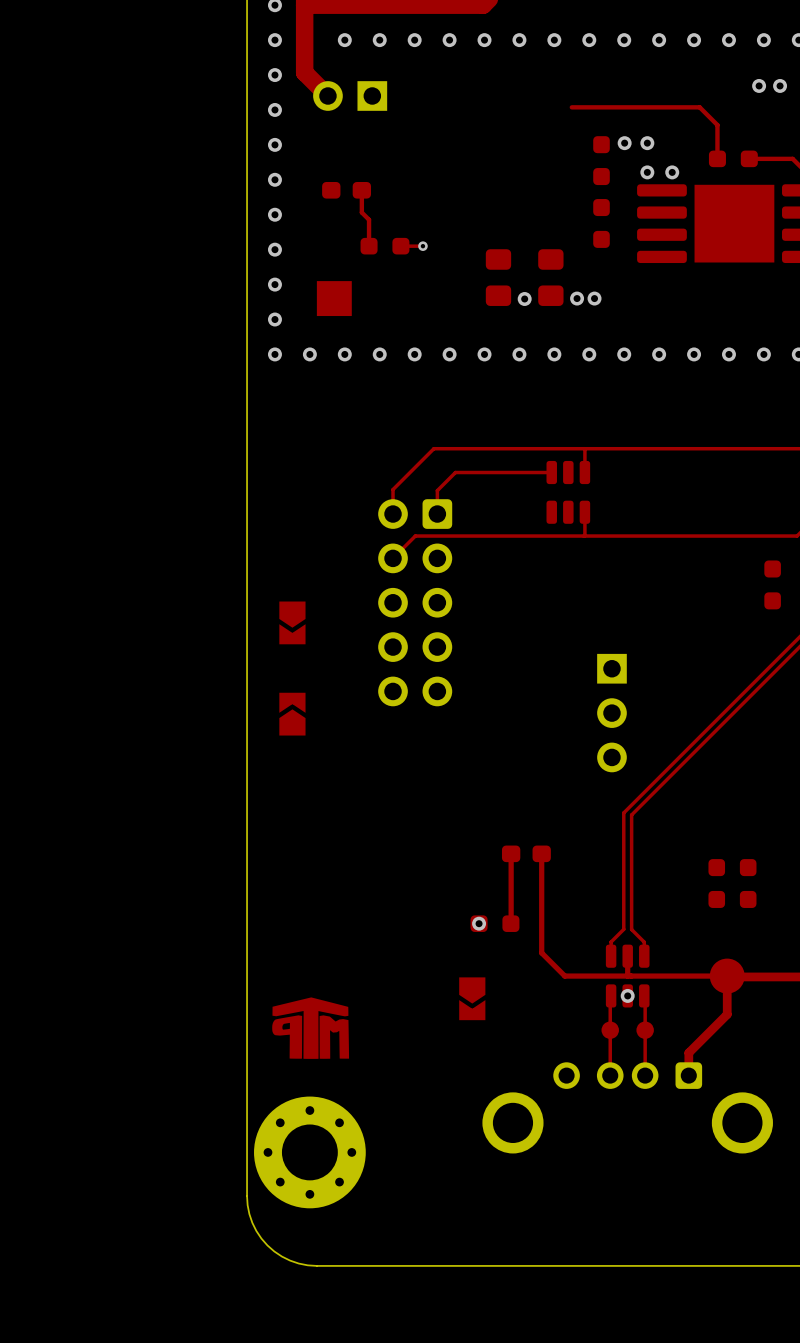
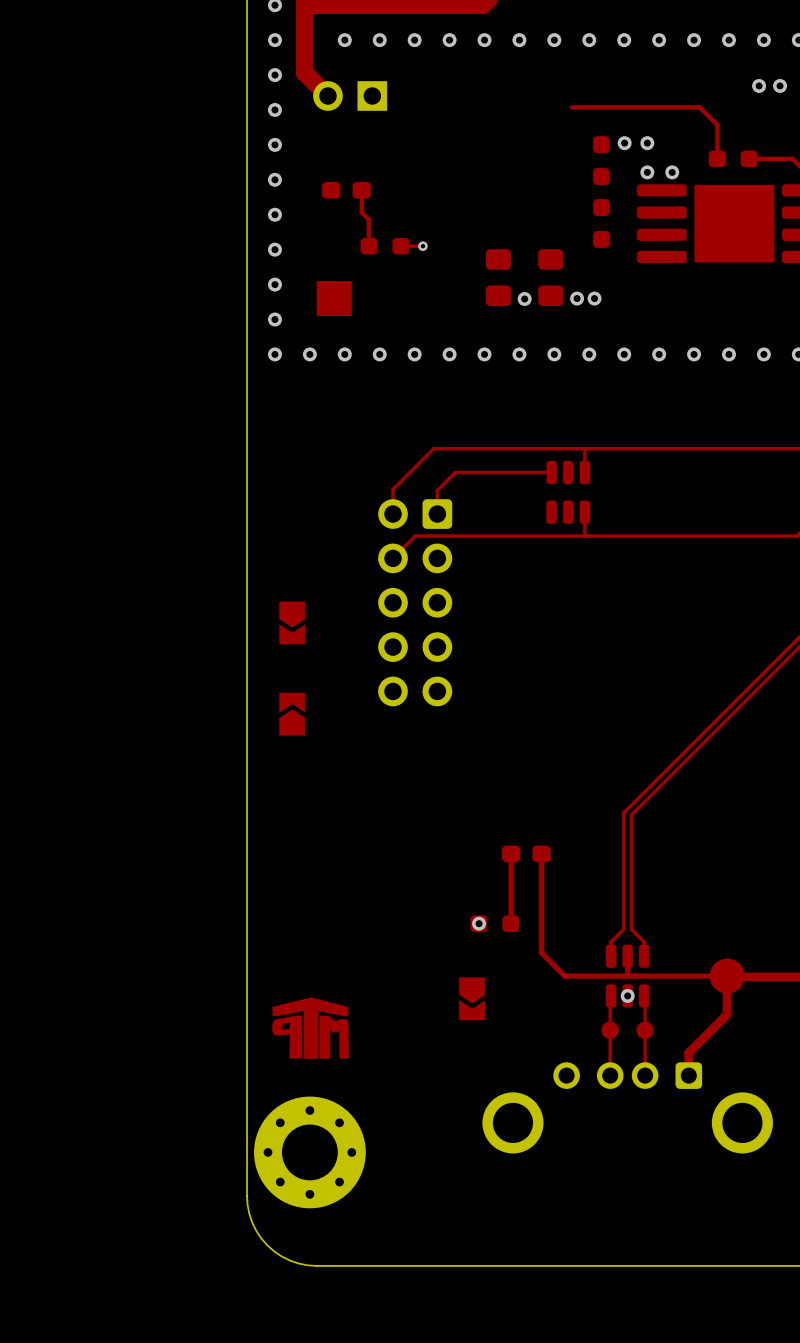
part: (772, 584) -> none
part: (611, 713) -> none
part: (716, 883) -> none
part: (748, 883) -> none

